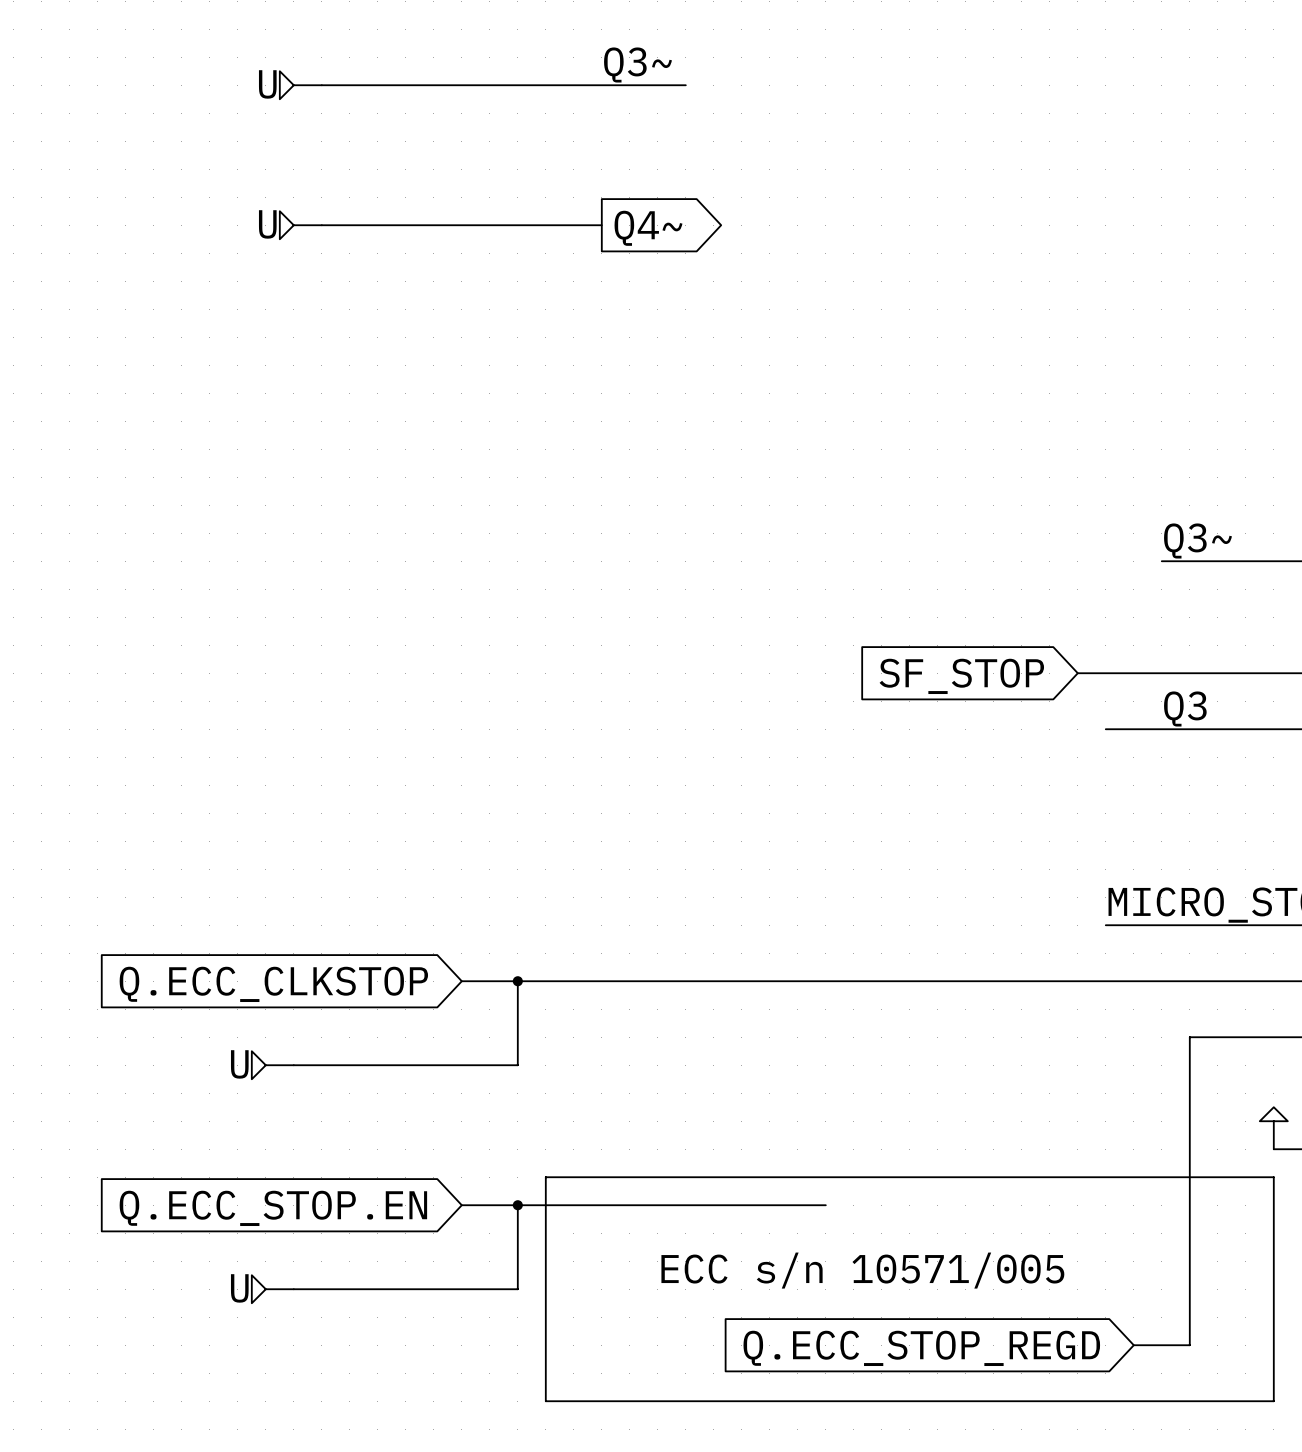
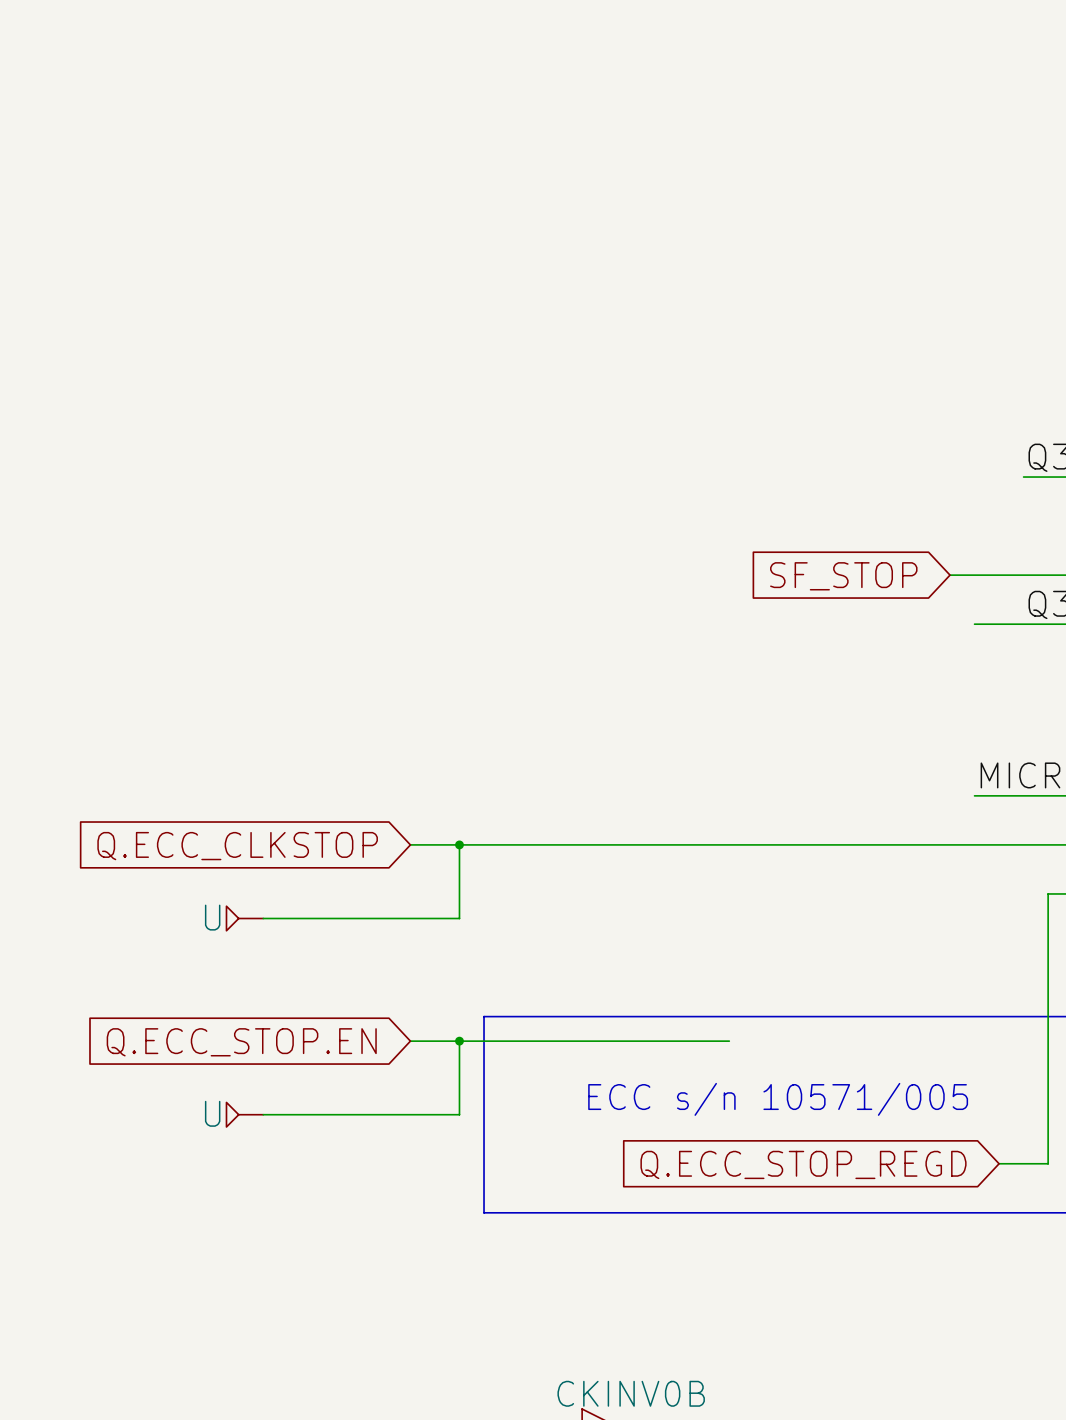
label: Q3~ (638, 64) -> none
U: (300, 85) -> none
wire: (321, 85) (685, 85) -> none
U: (300, 225) -> none
wire: (321, 225) (601, 225) -> none
global label: Q4~ (648, 228) -> none

